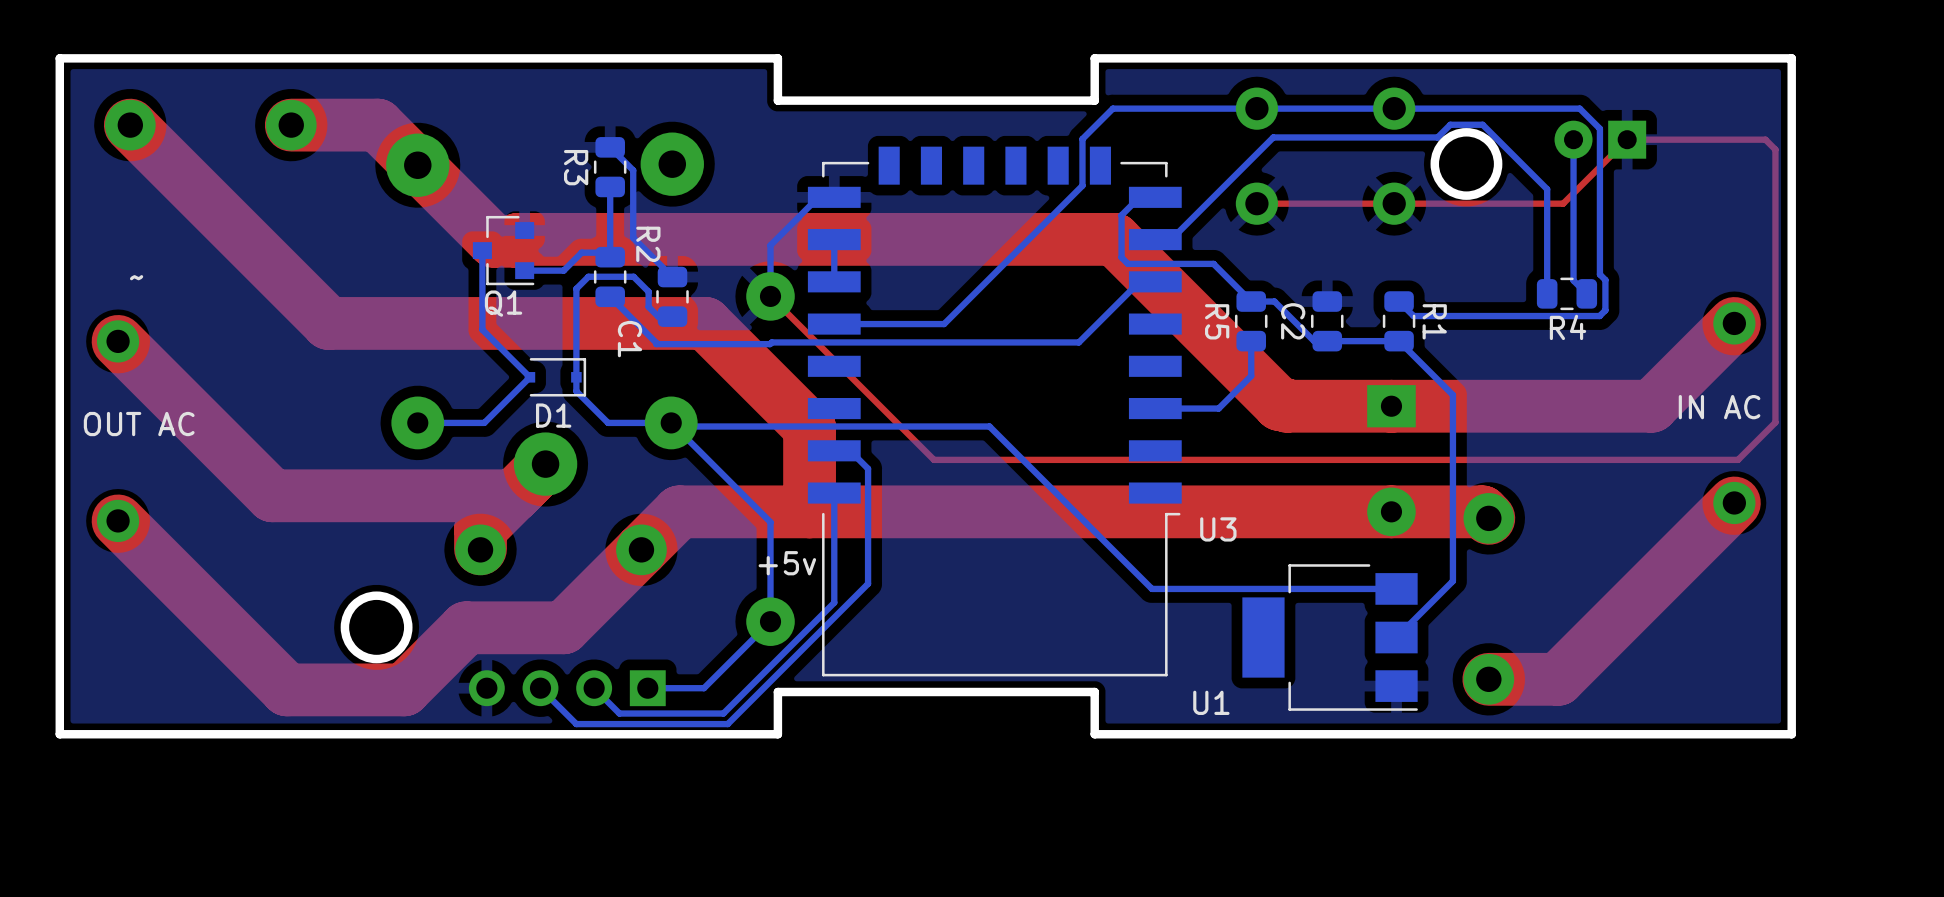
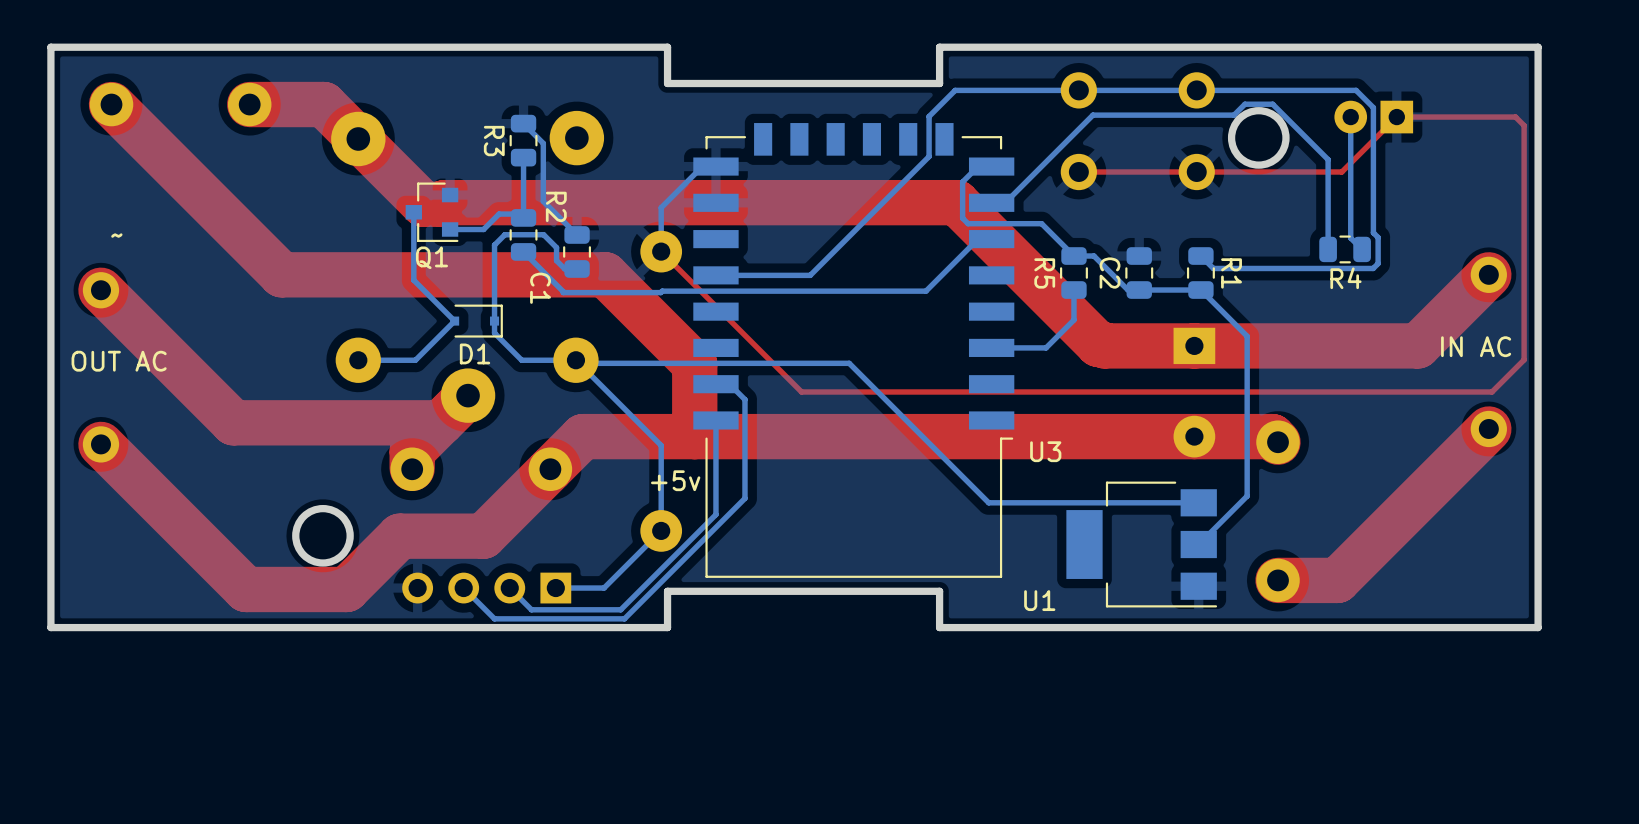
bottom track: (834, 239) (834, 281) -> none

